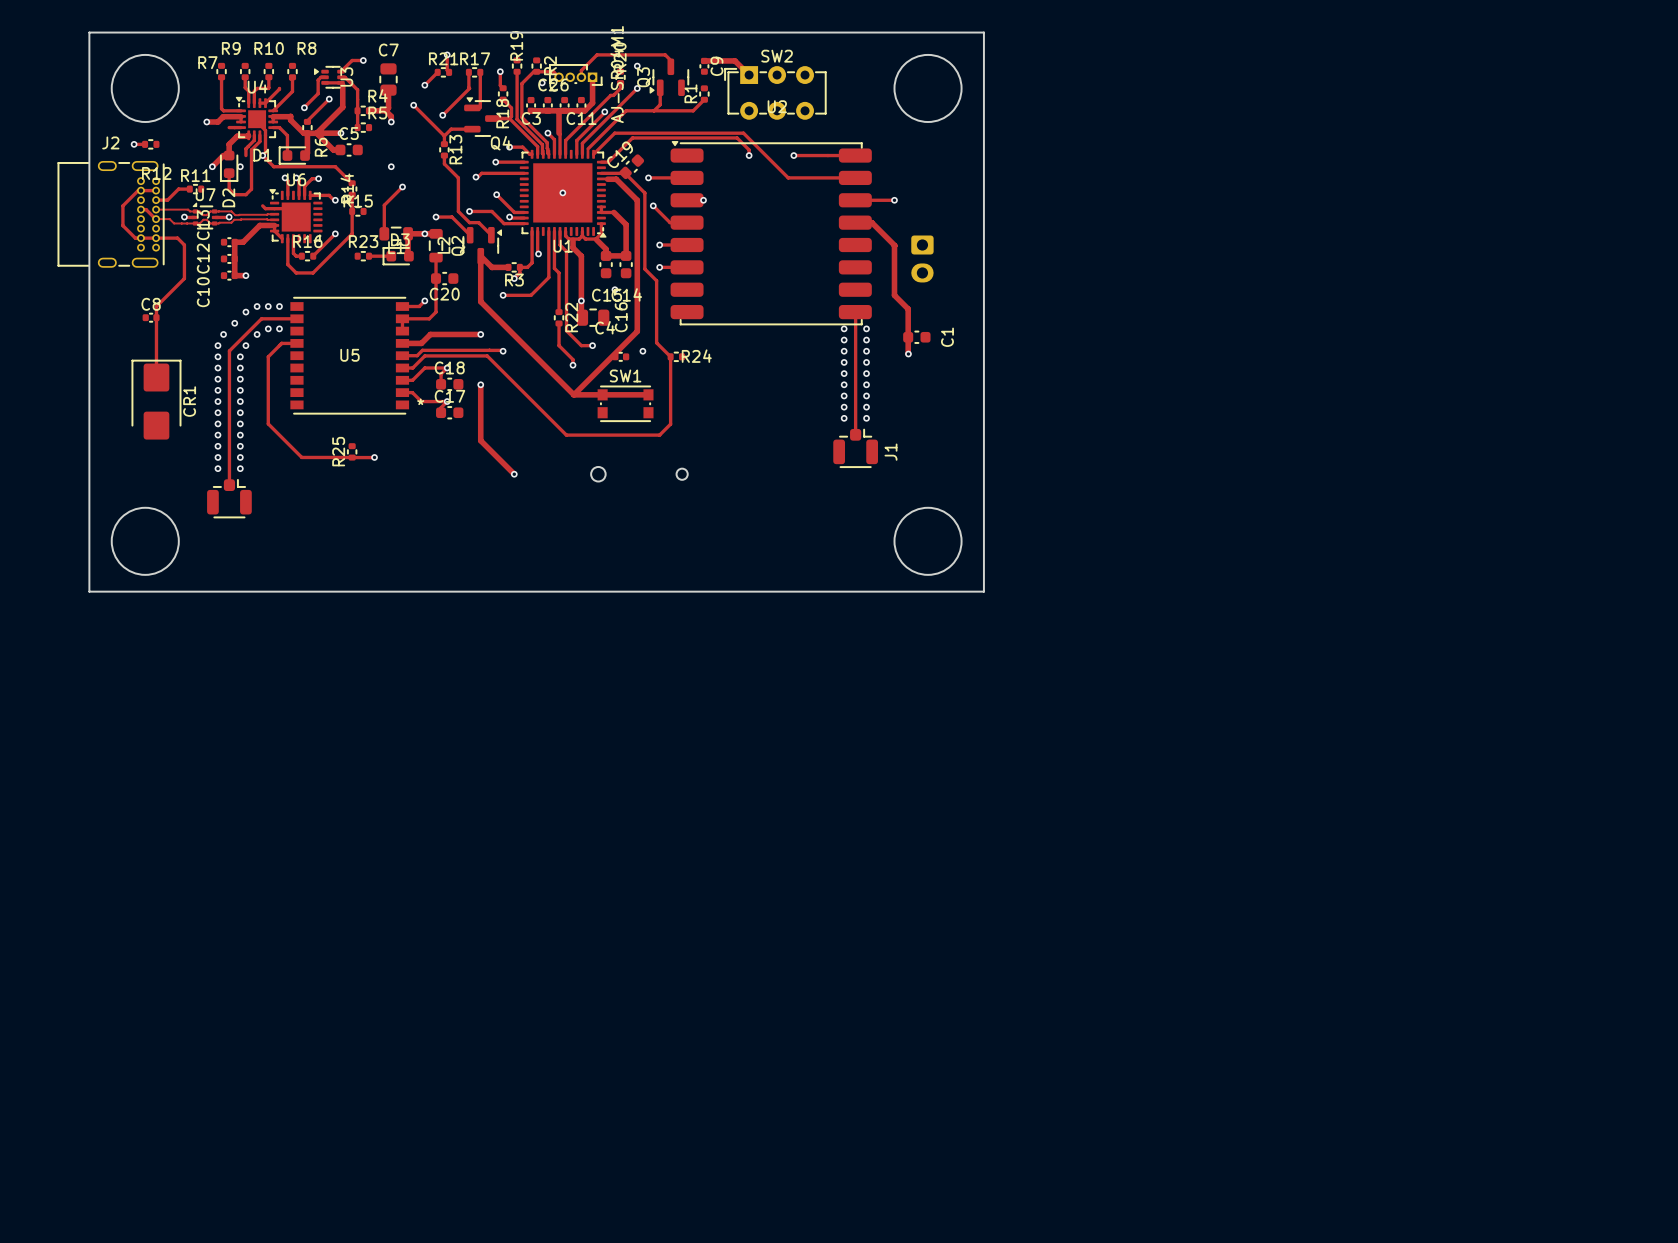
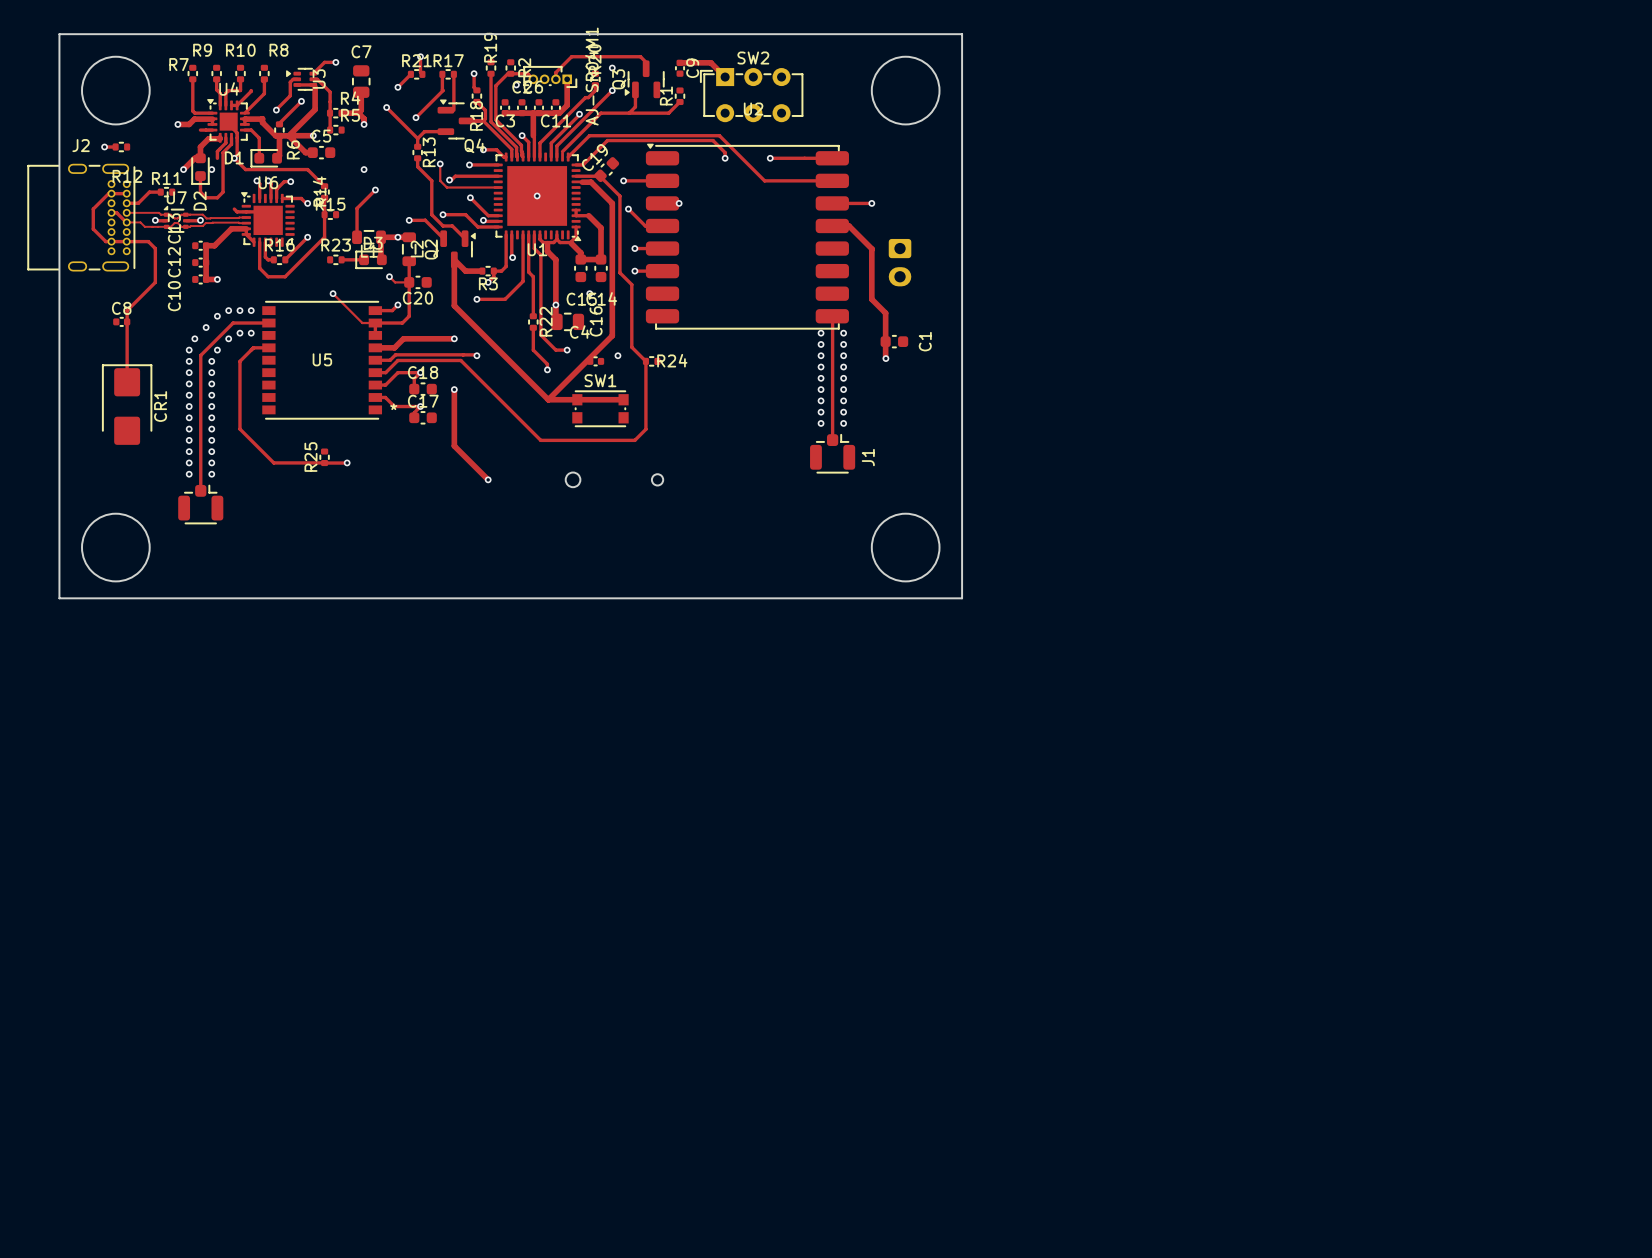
track: none -> (440, 163) (440, 180) (446, 187) (498, 187)
via: none -> (440, 163)
track: none -> (389, 276) (395, 282) (404, 282)
via: none -> (389, 276)
track: none -> (333, 293) (362, 323) (370, 323)
via: none -> (333, 293)

